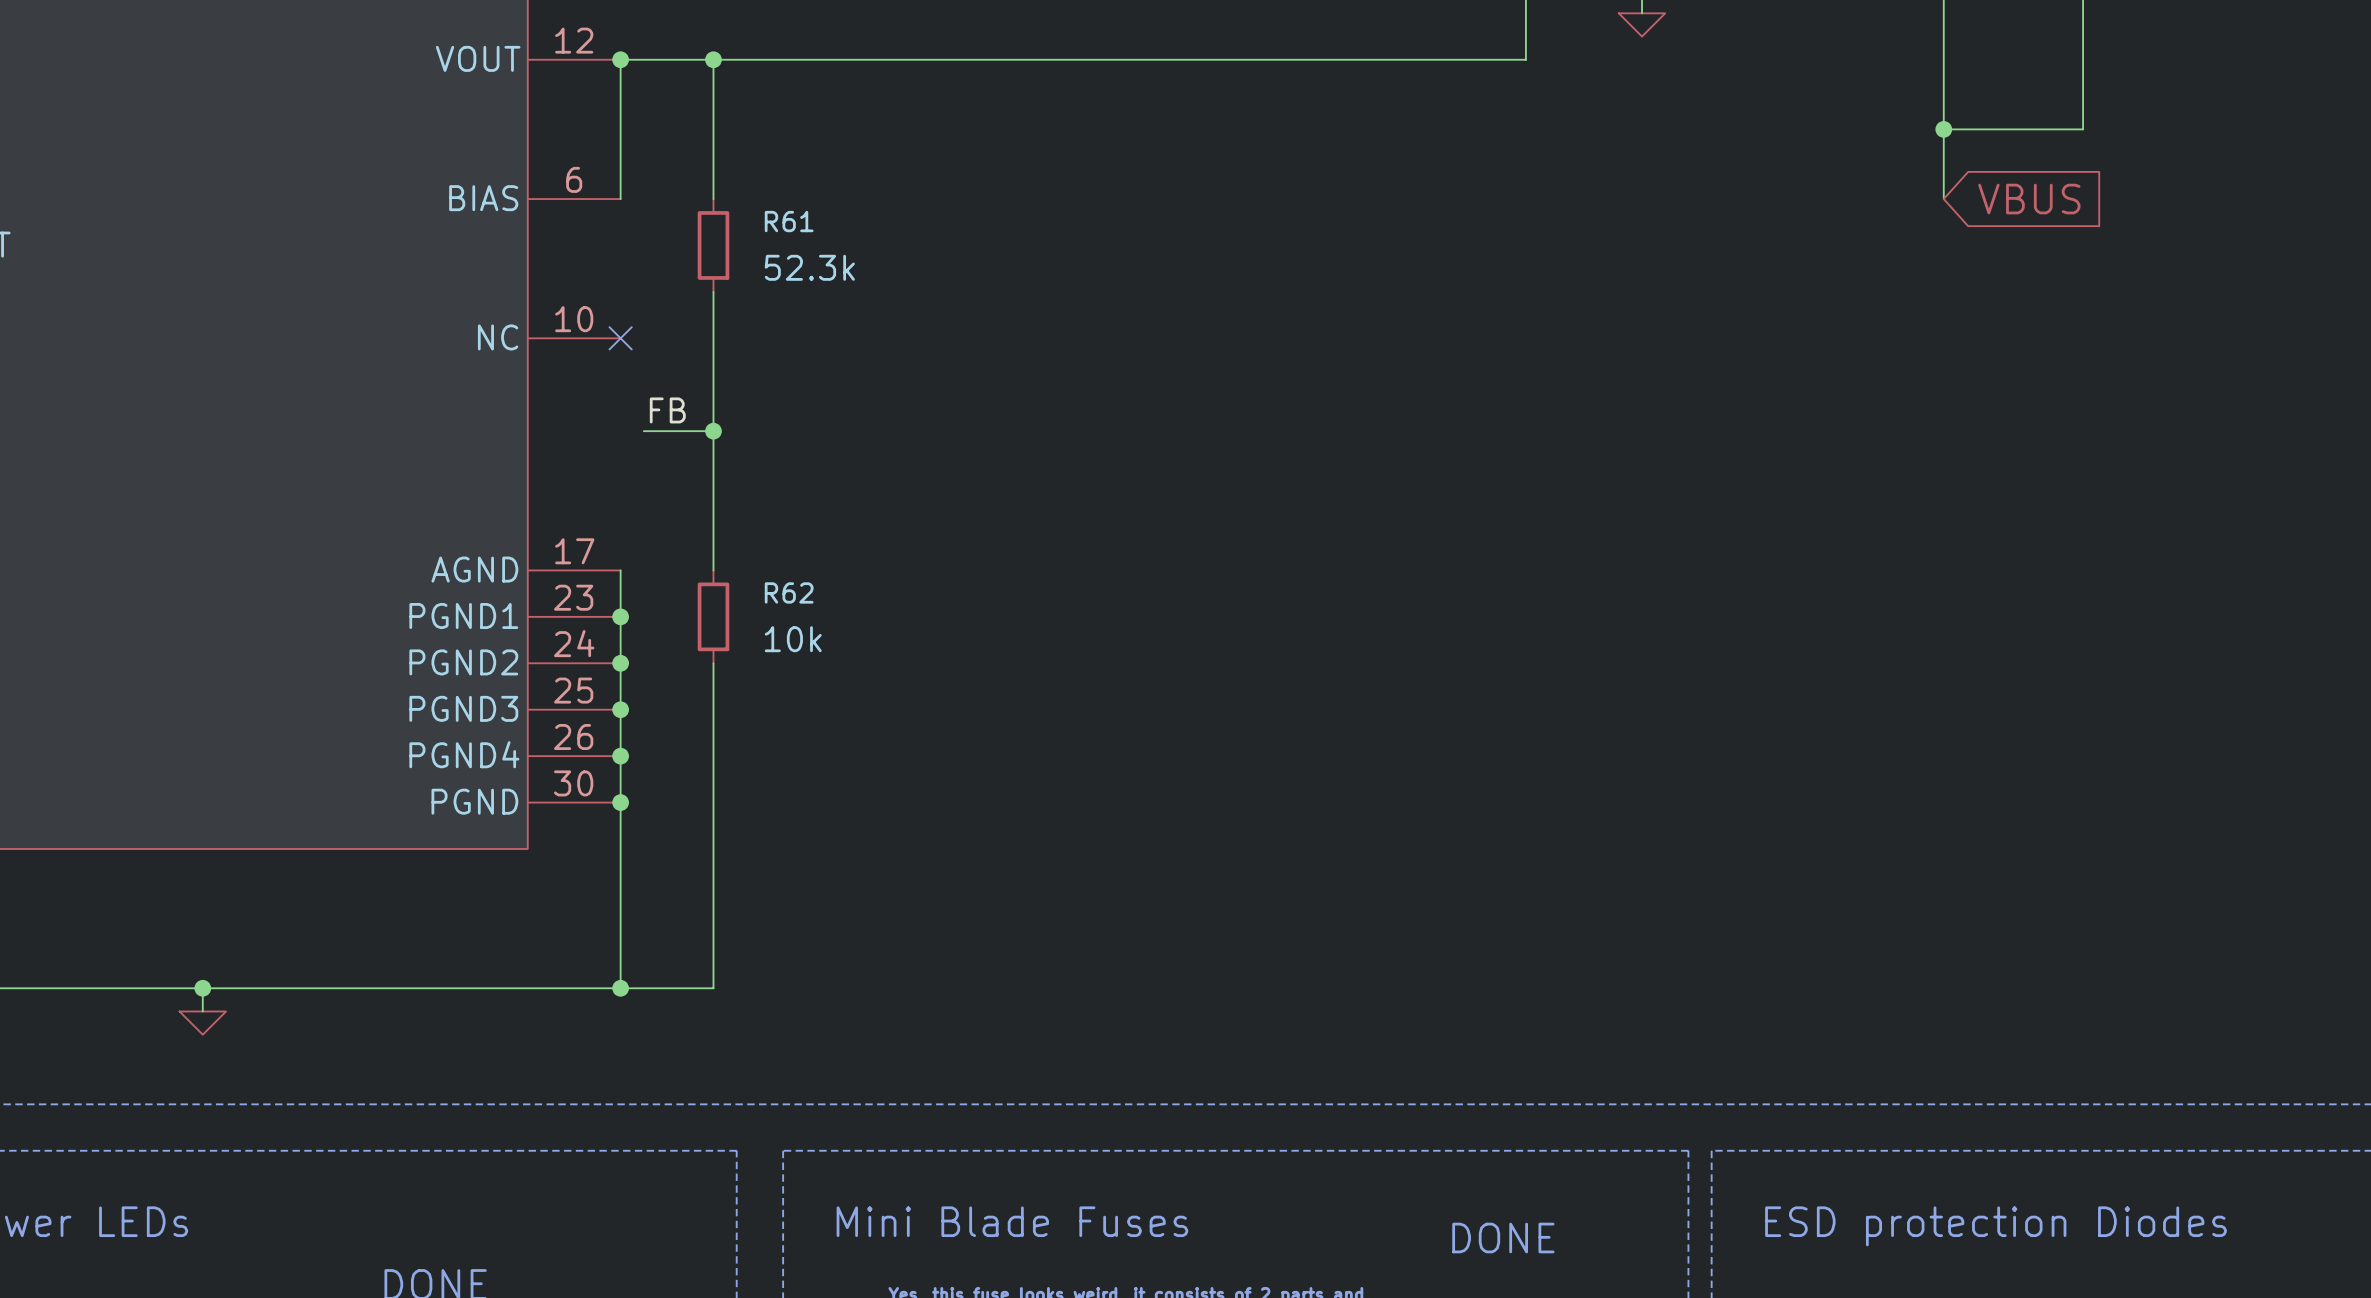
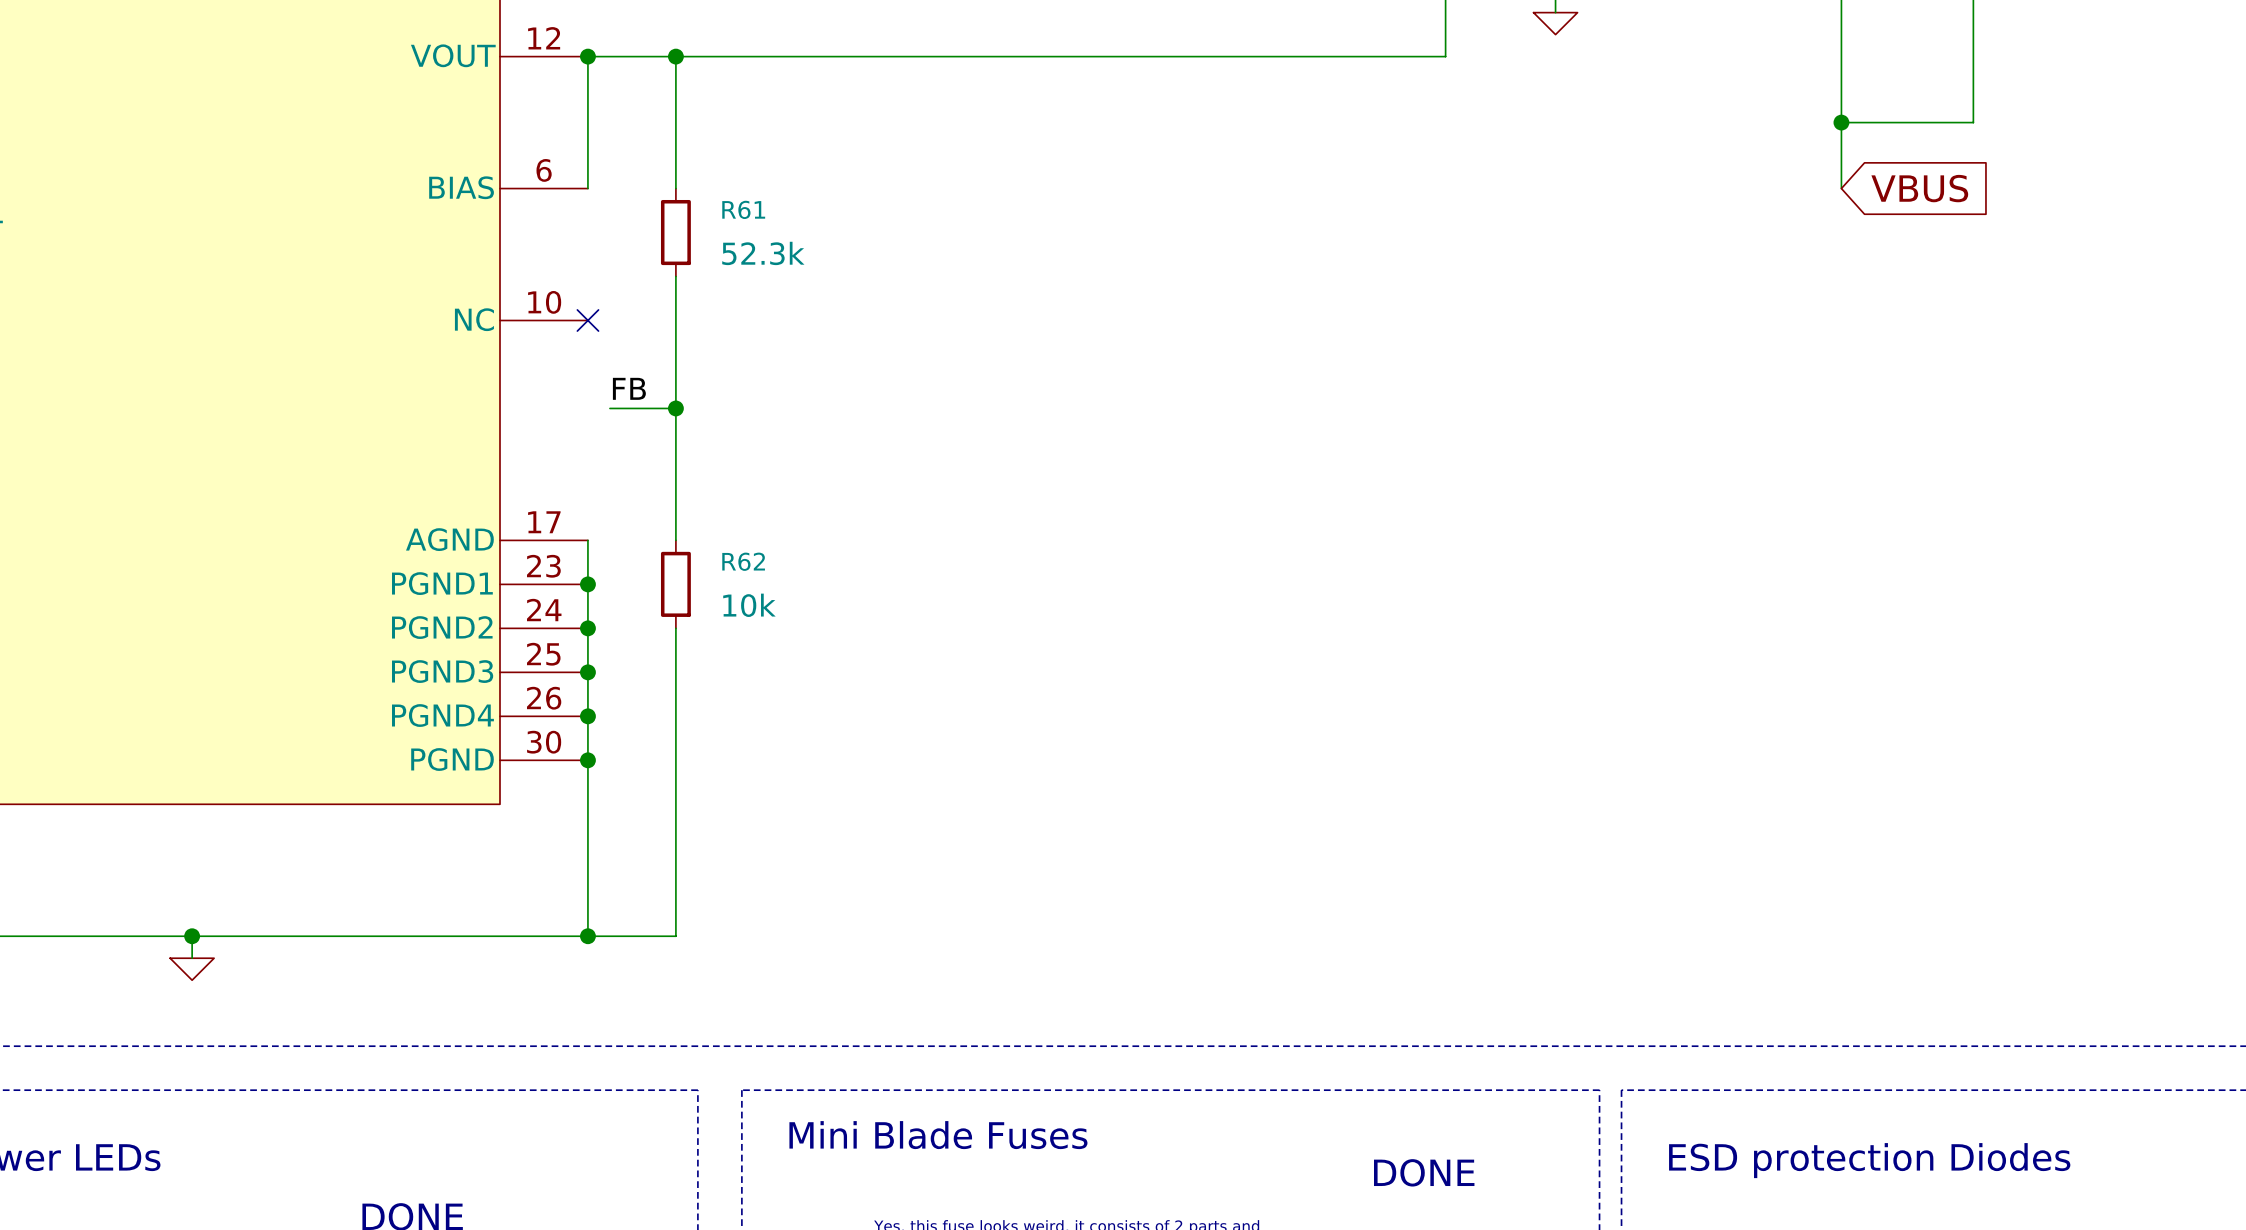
text position: Mini Blade Fuses (1012, 1221) -> Mini Blade Fuses (938, 1135)

